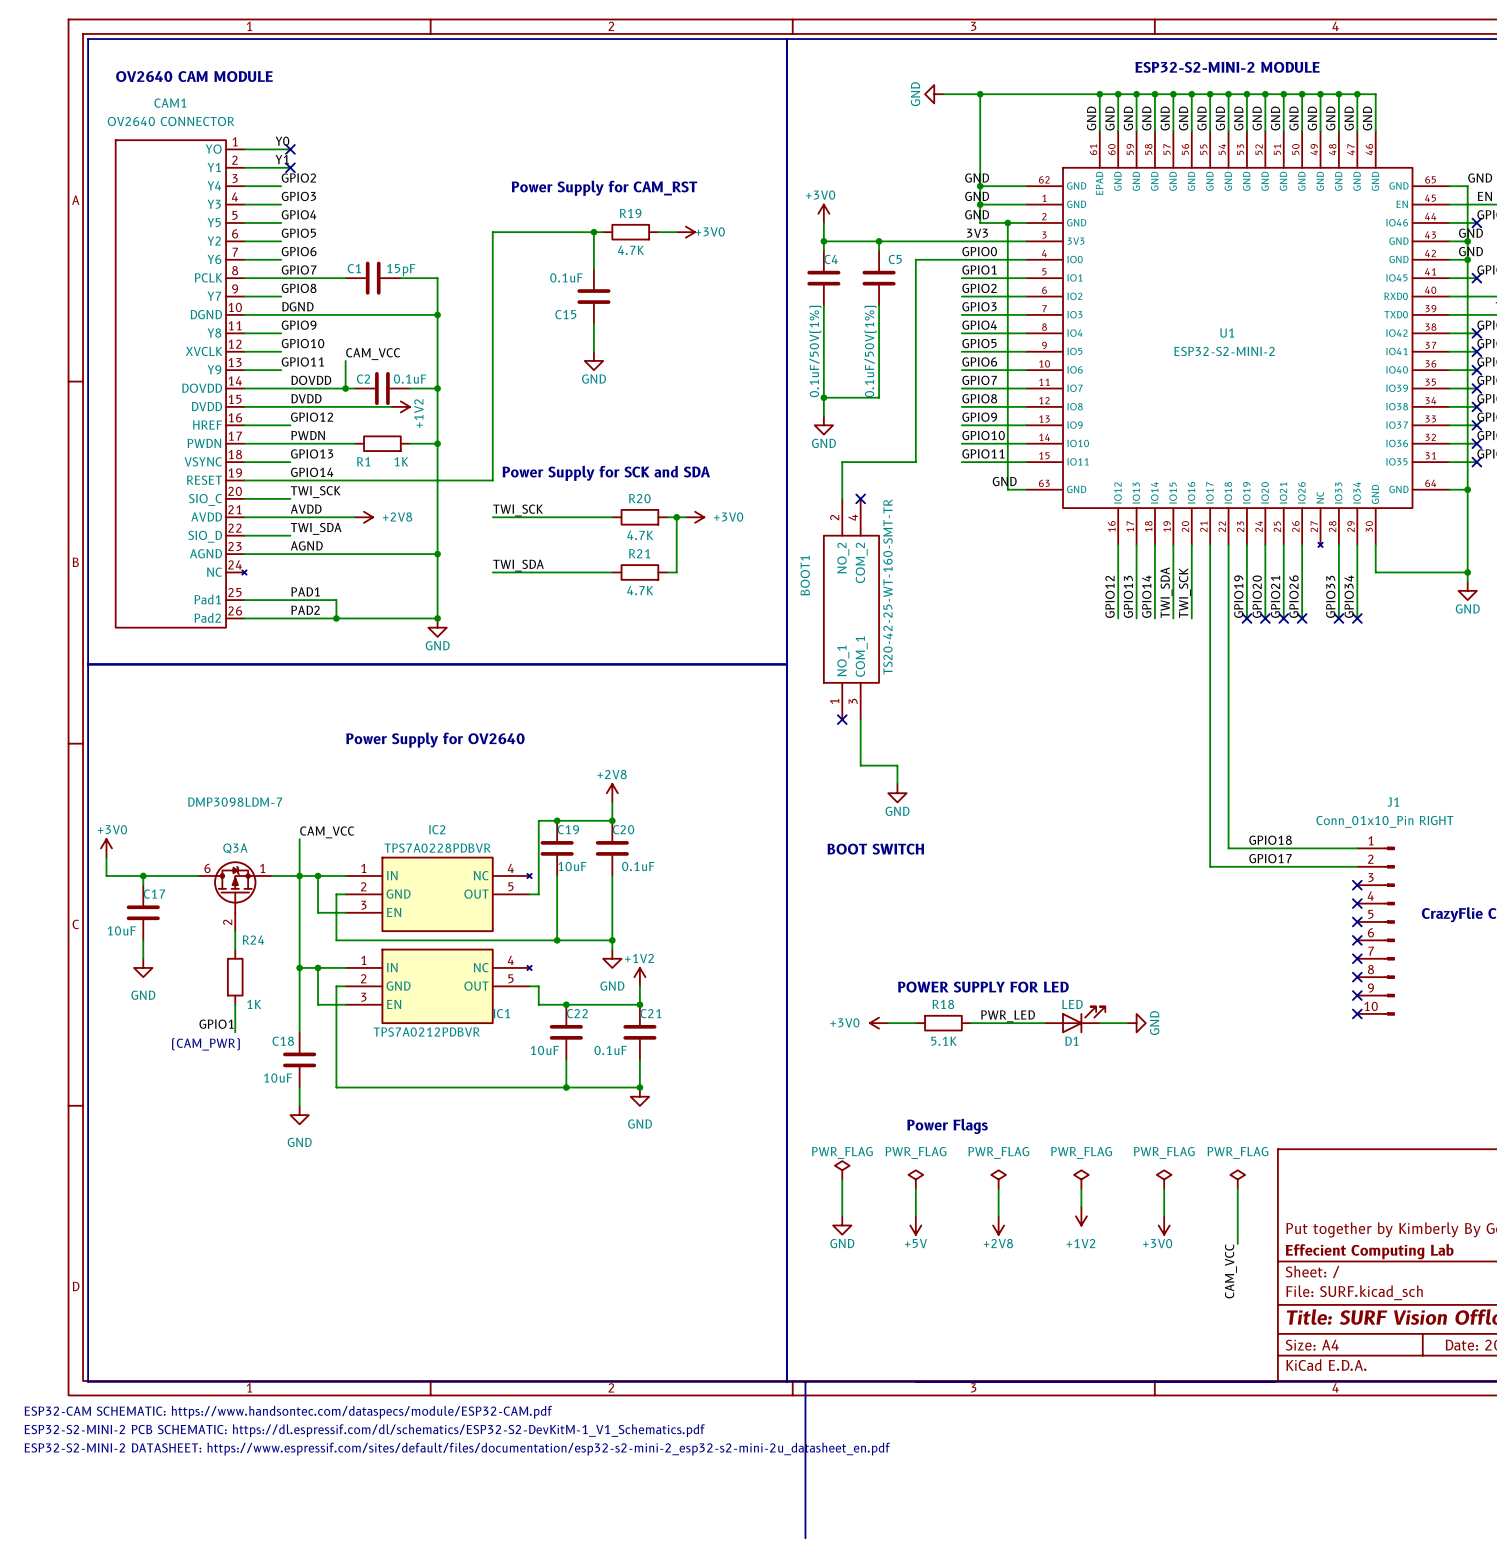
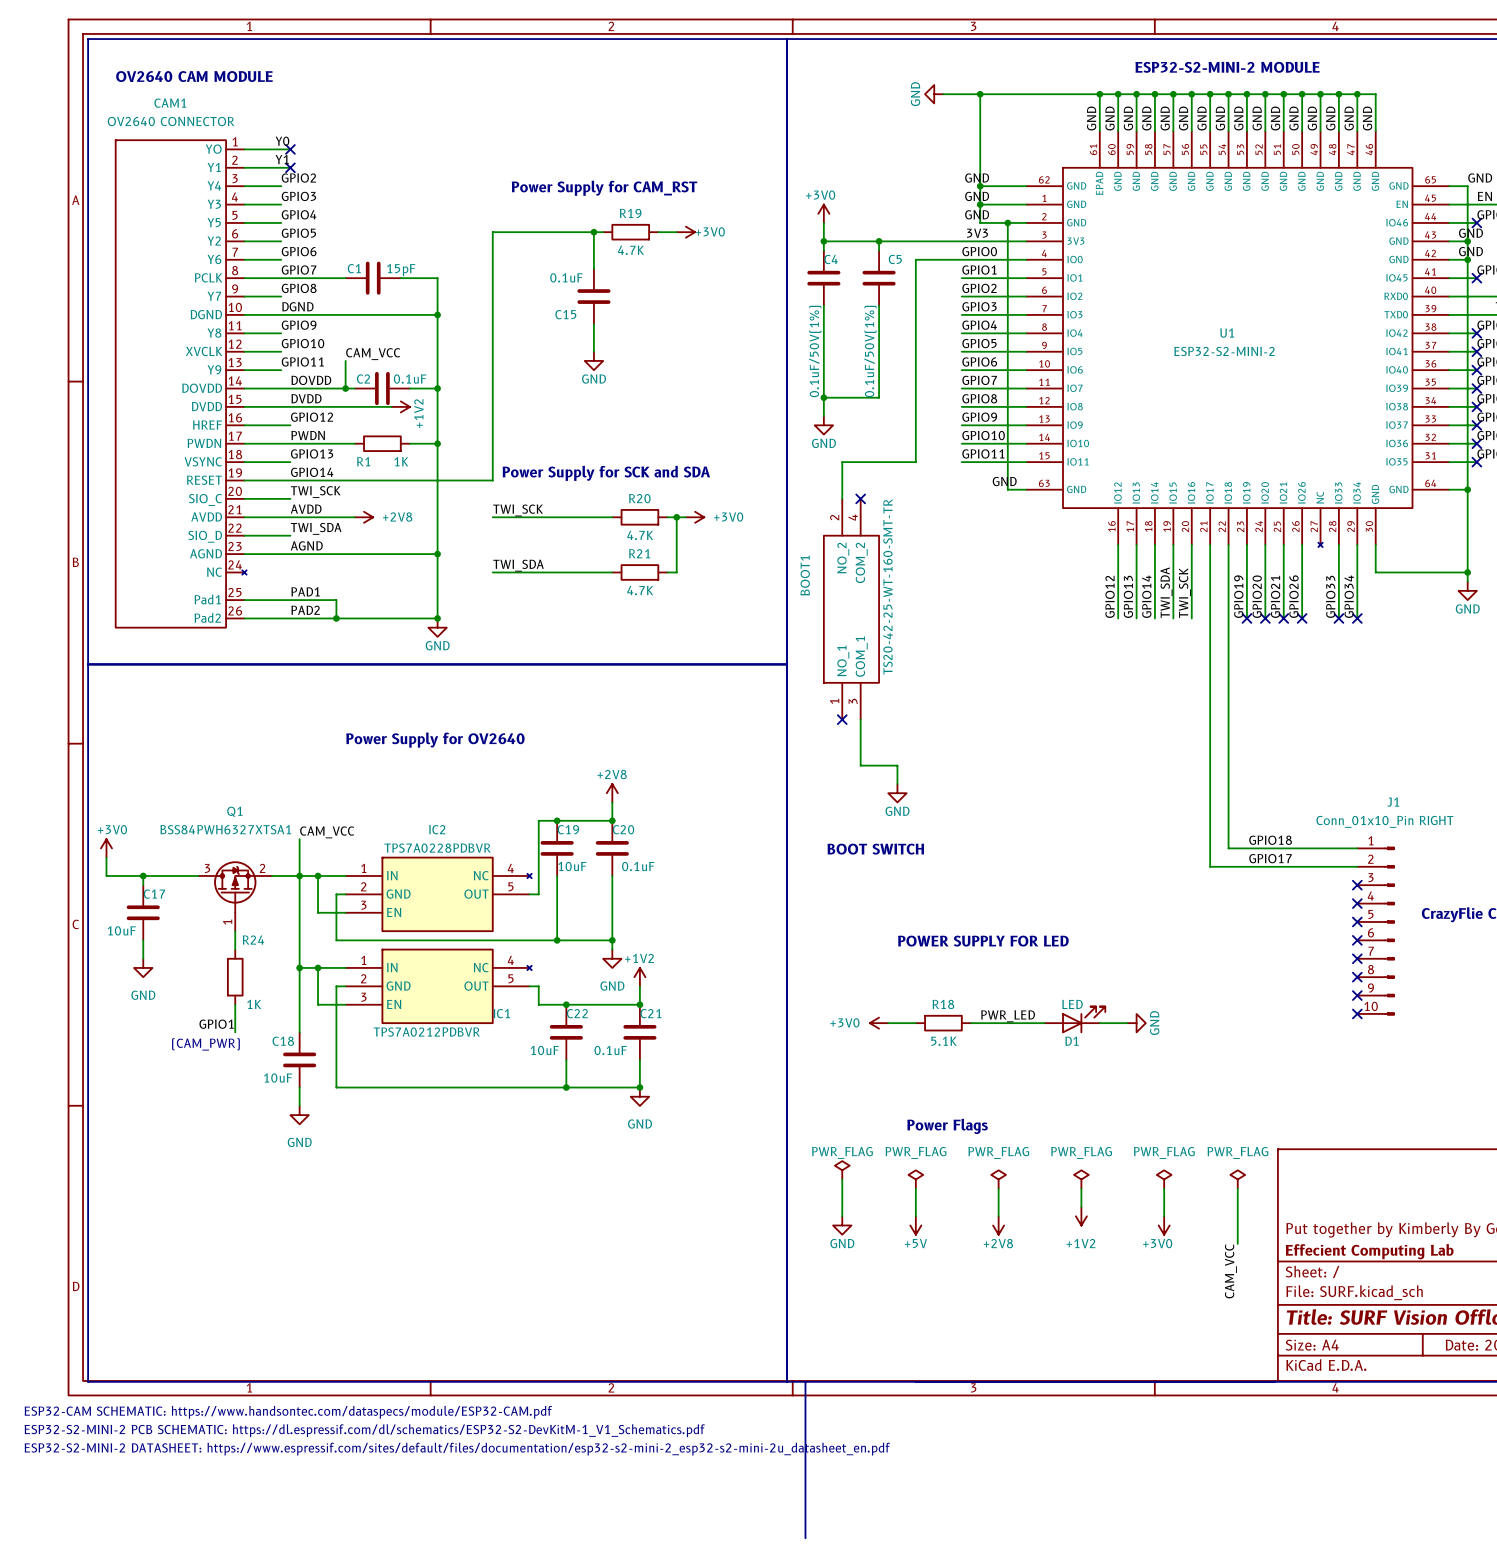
Q3A value: DMP3098LDM-7 (235, 802) -> BSS84PWH6327XTSA1 (225, 829)
Q3A name: Q3A (235, 848) -> Q1 (234, 811)
Q3A pin number: 6 (207, 868) -> 3 (207, 868)
Q3A pin number: 1 (262, 868) -> 2 (262, 868)
Q3A pin number: 2 (227, 922) -> 1 (227, 922)
text position: POWER SUPPLY FOR LED (983, 987) -> POWER SUPPLY FOR LED (983, 941)

